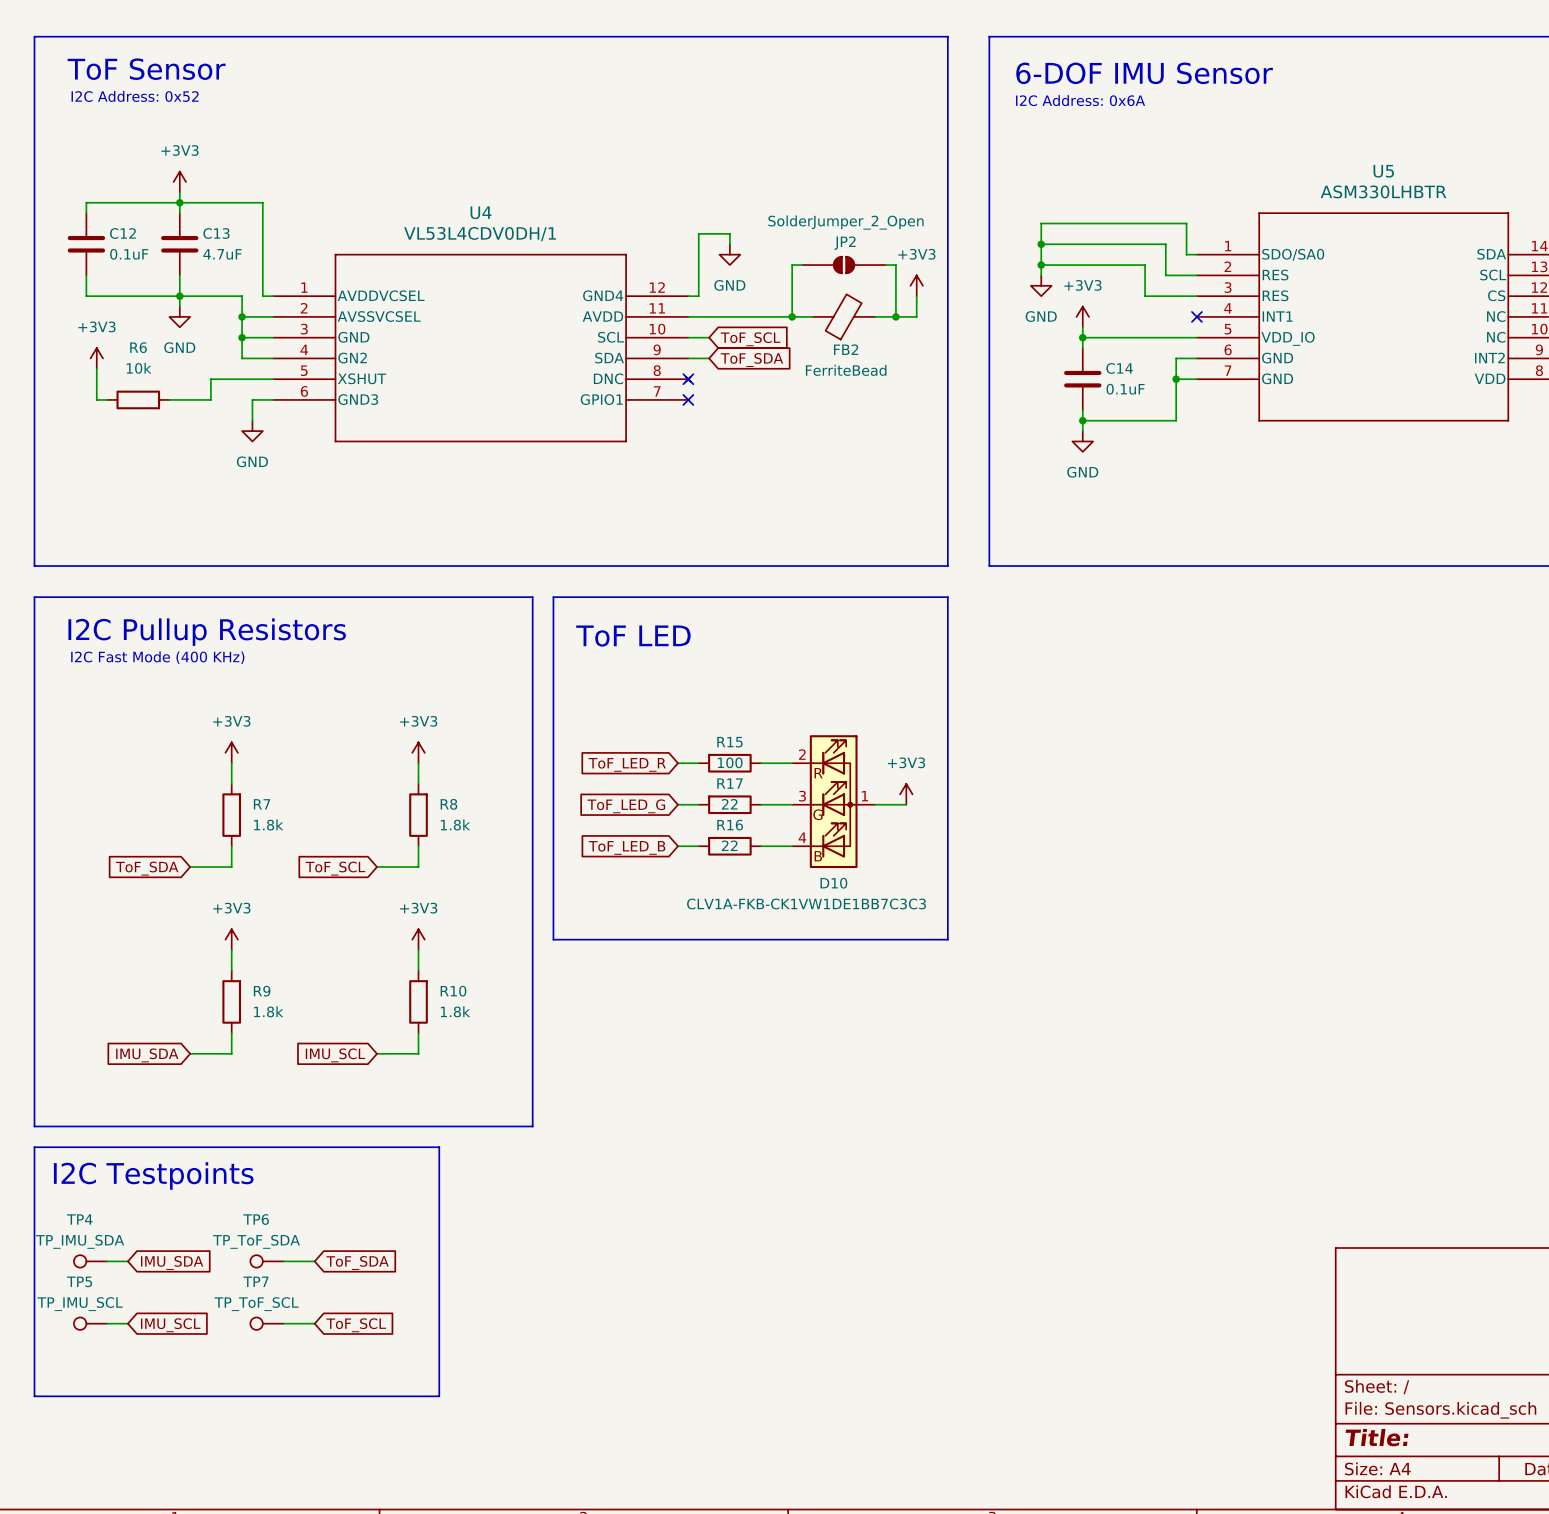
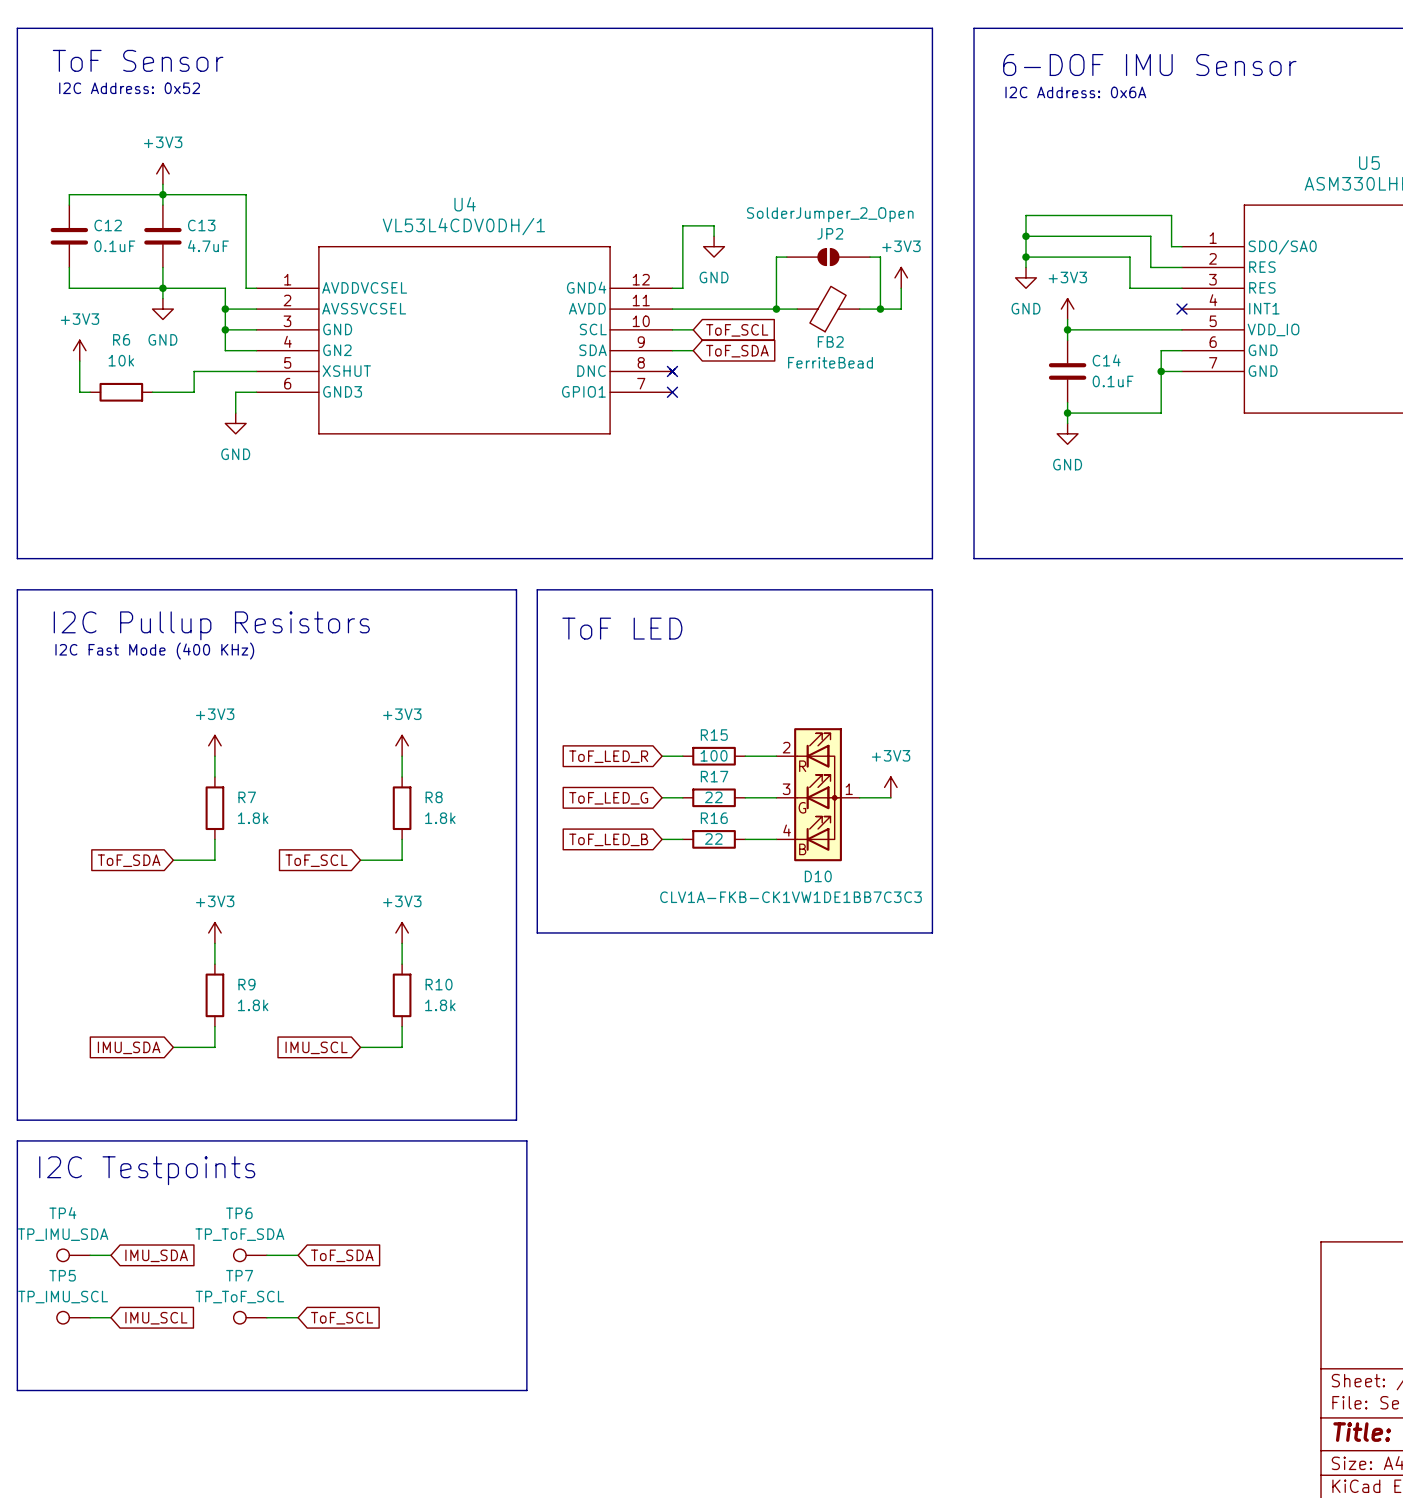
line: (439, 1147) (439, 1396) -> (422, 1140) (526, 1140) (526, 1390) (422, 1390)

